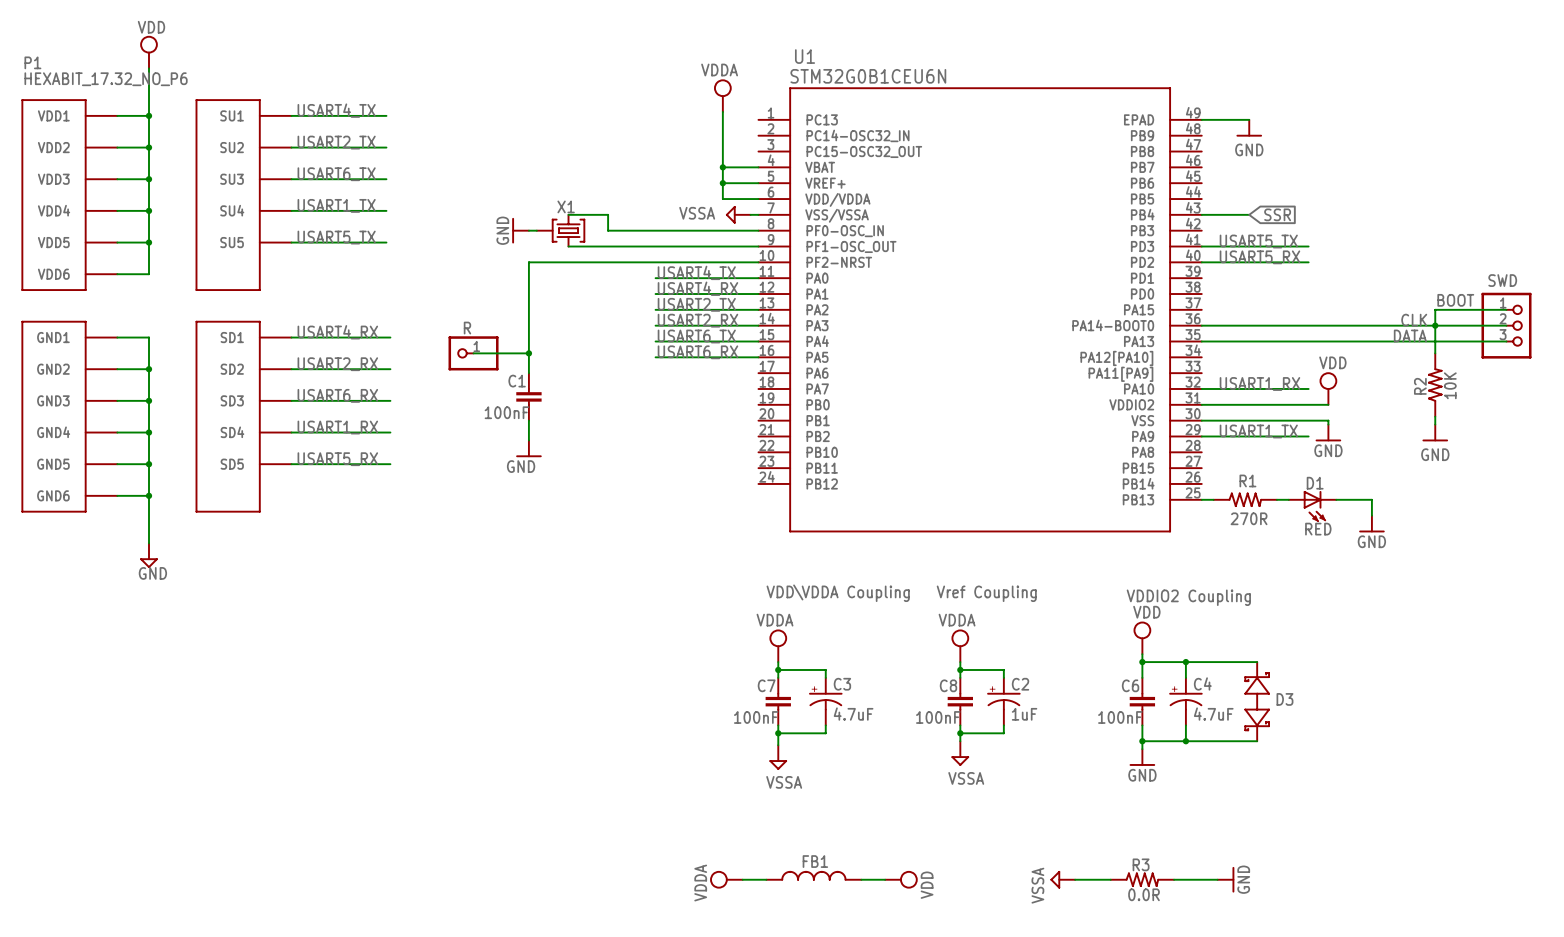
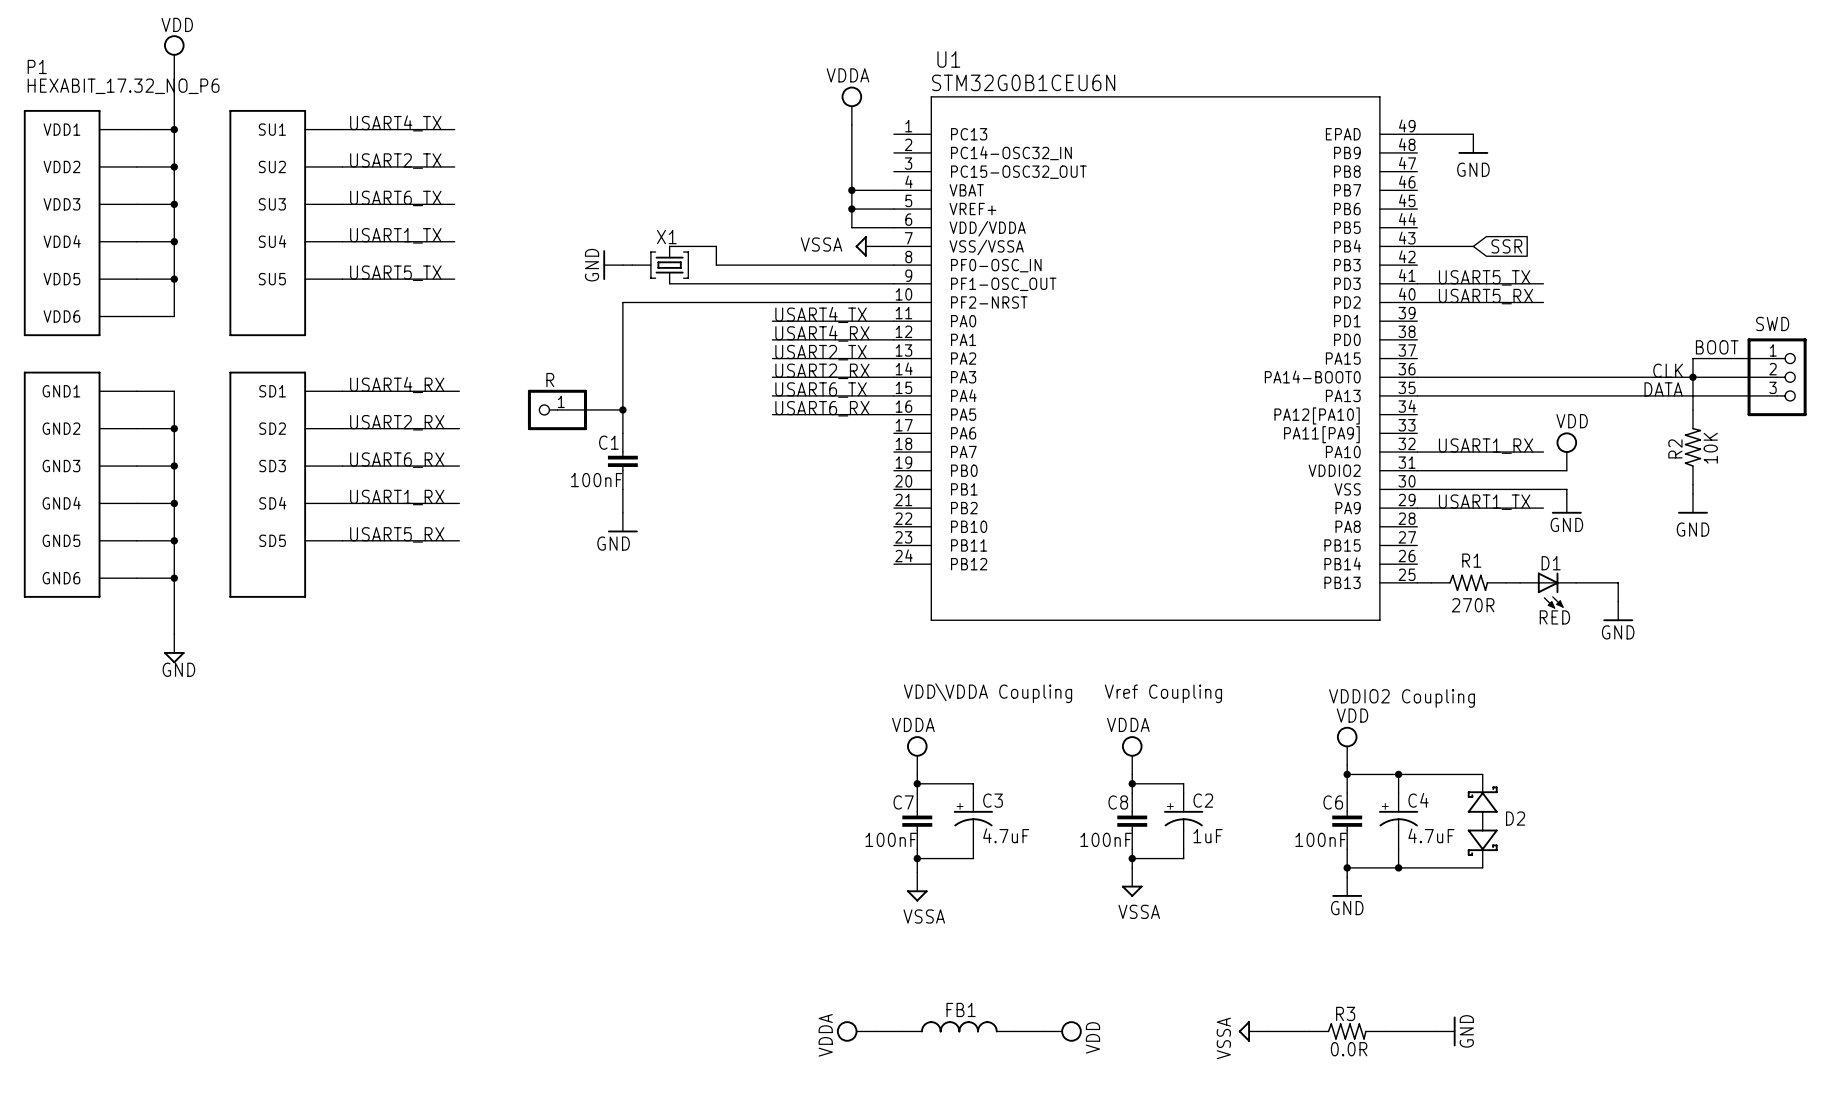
D3 name: D3 (1284, 699) -> D2 (1515, 818)

